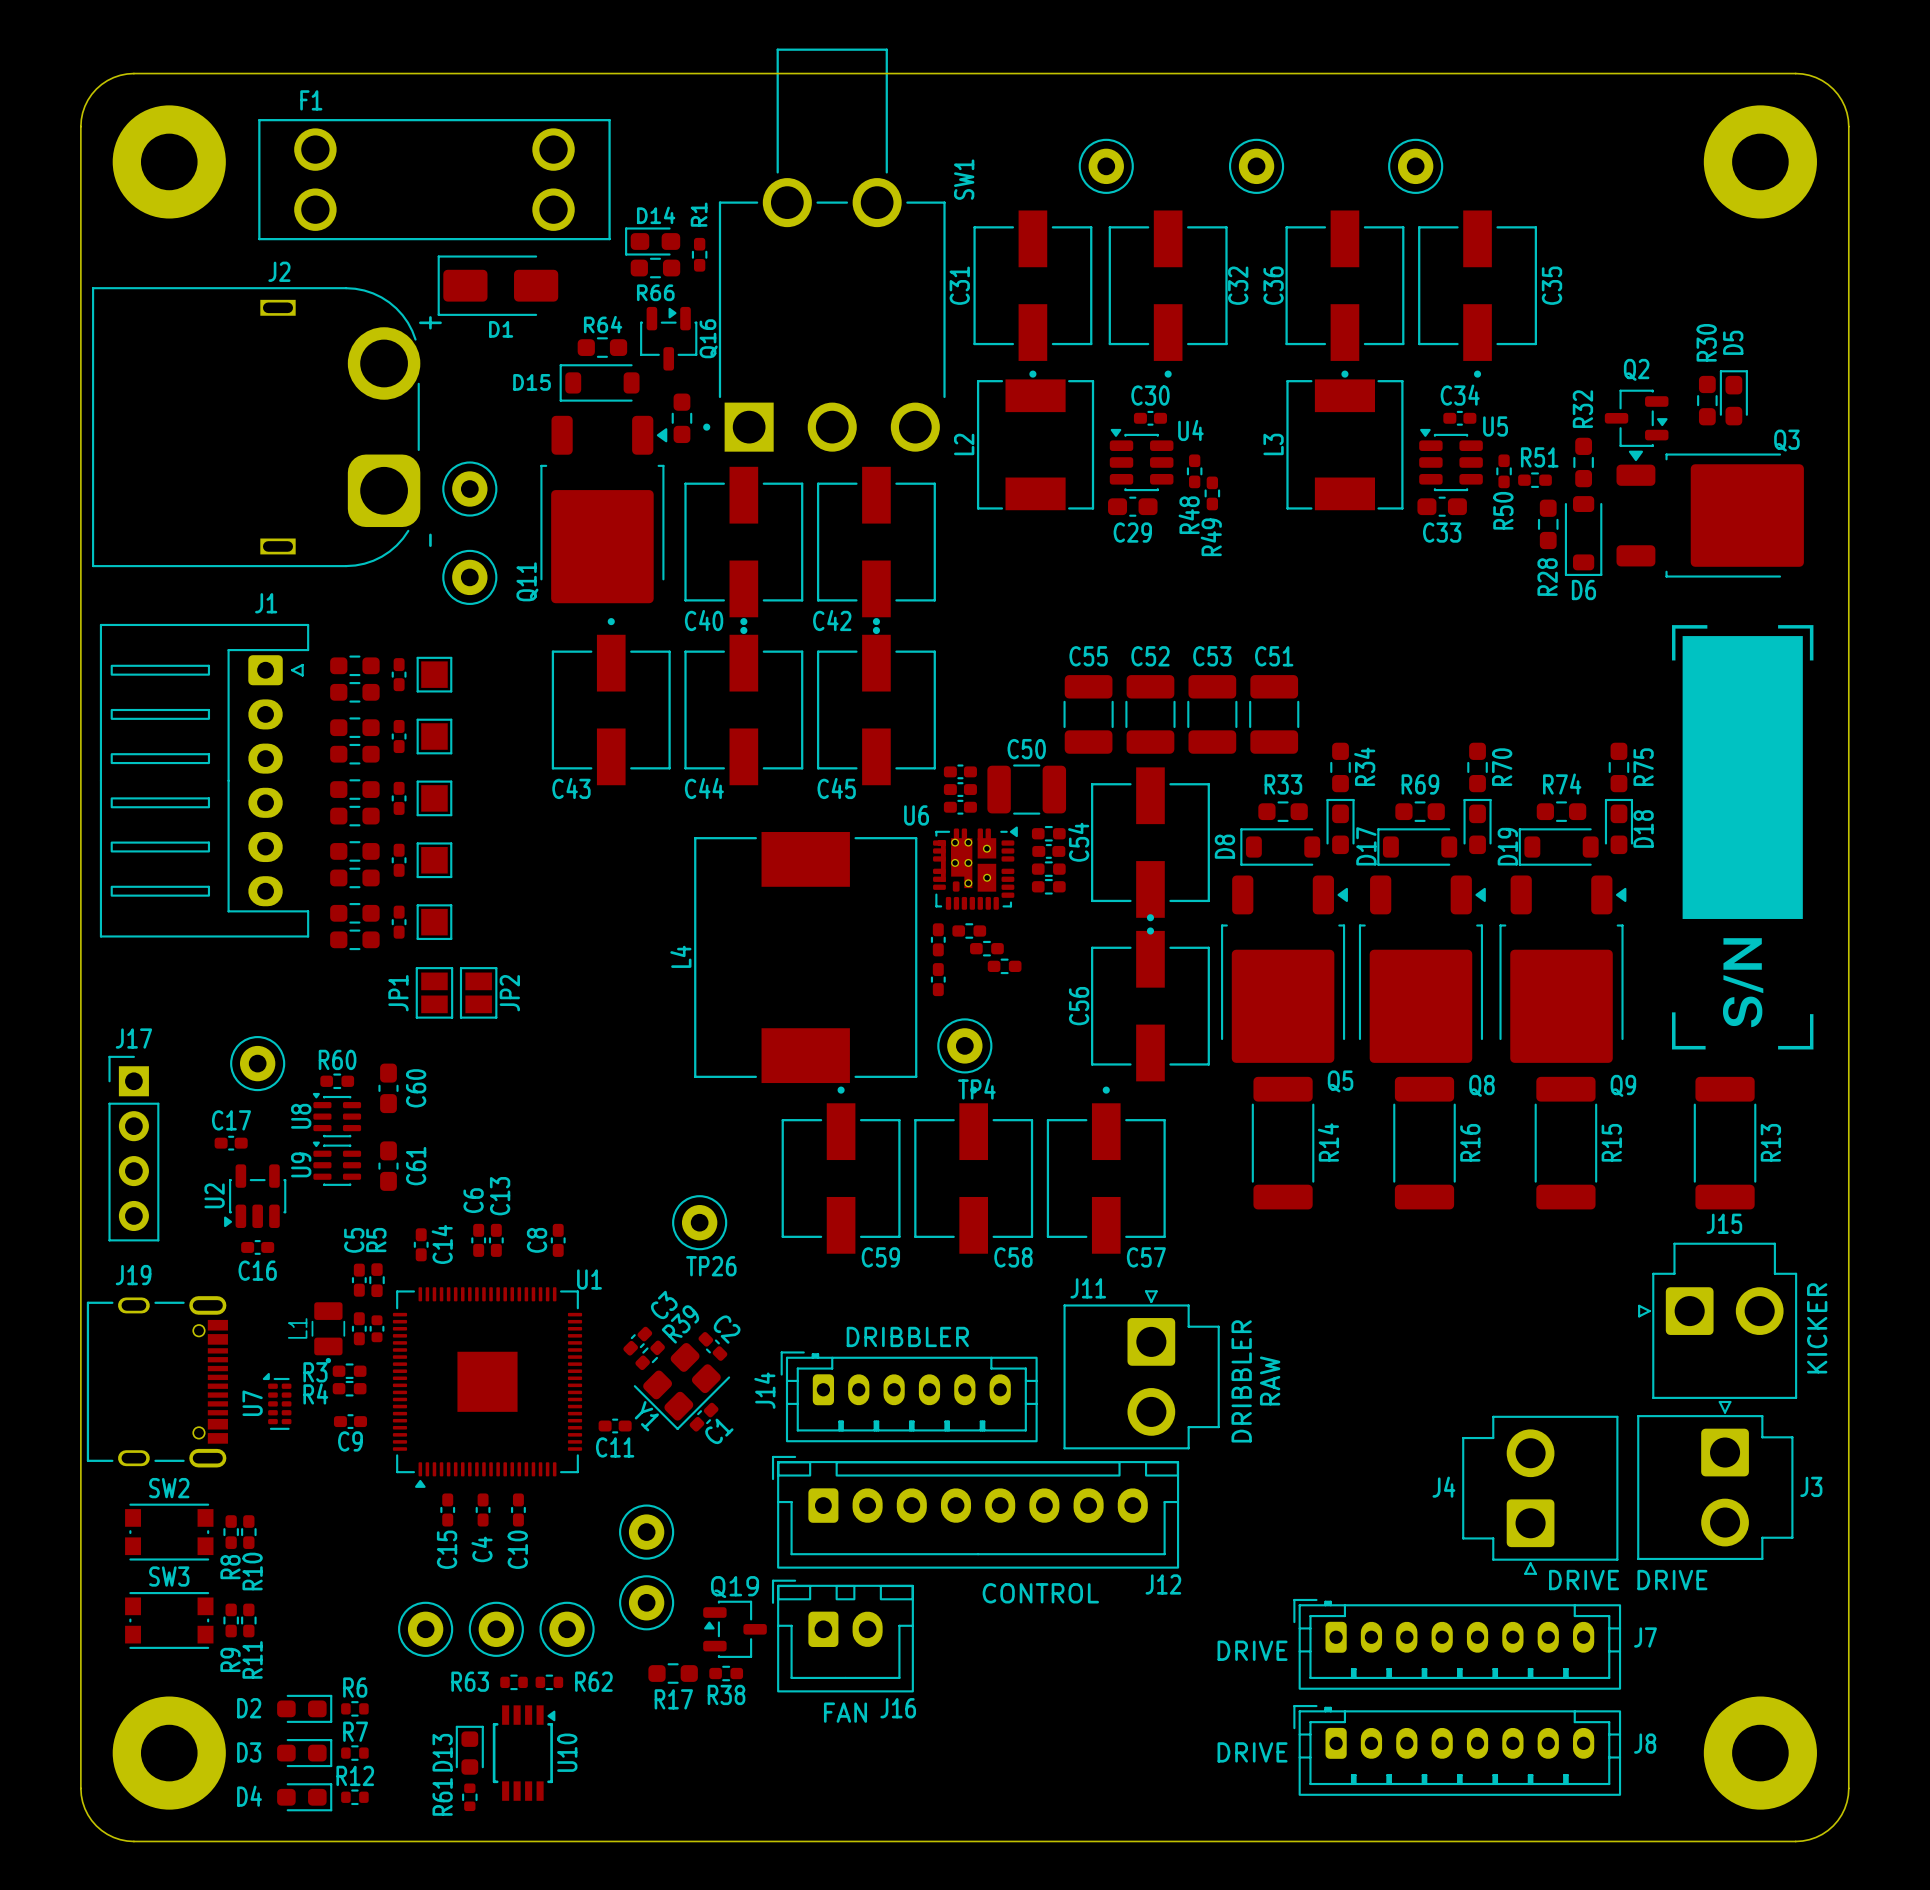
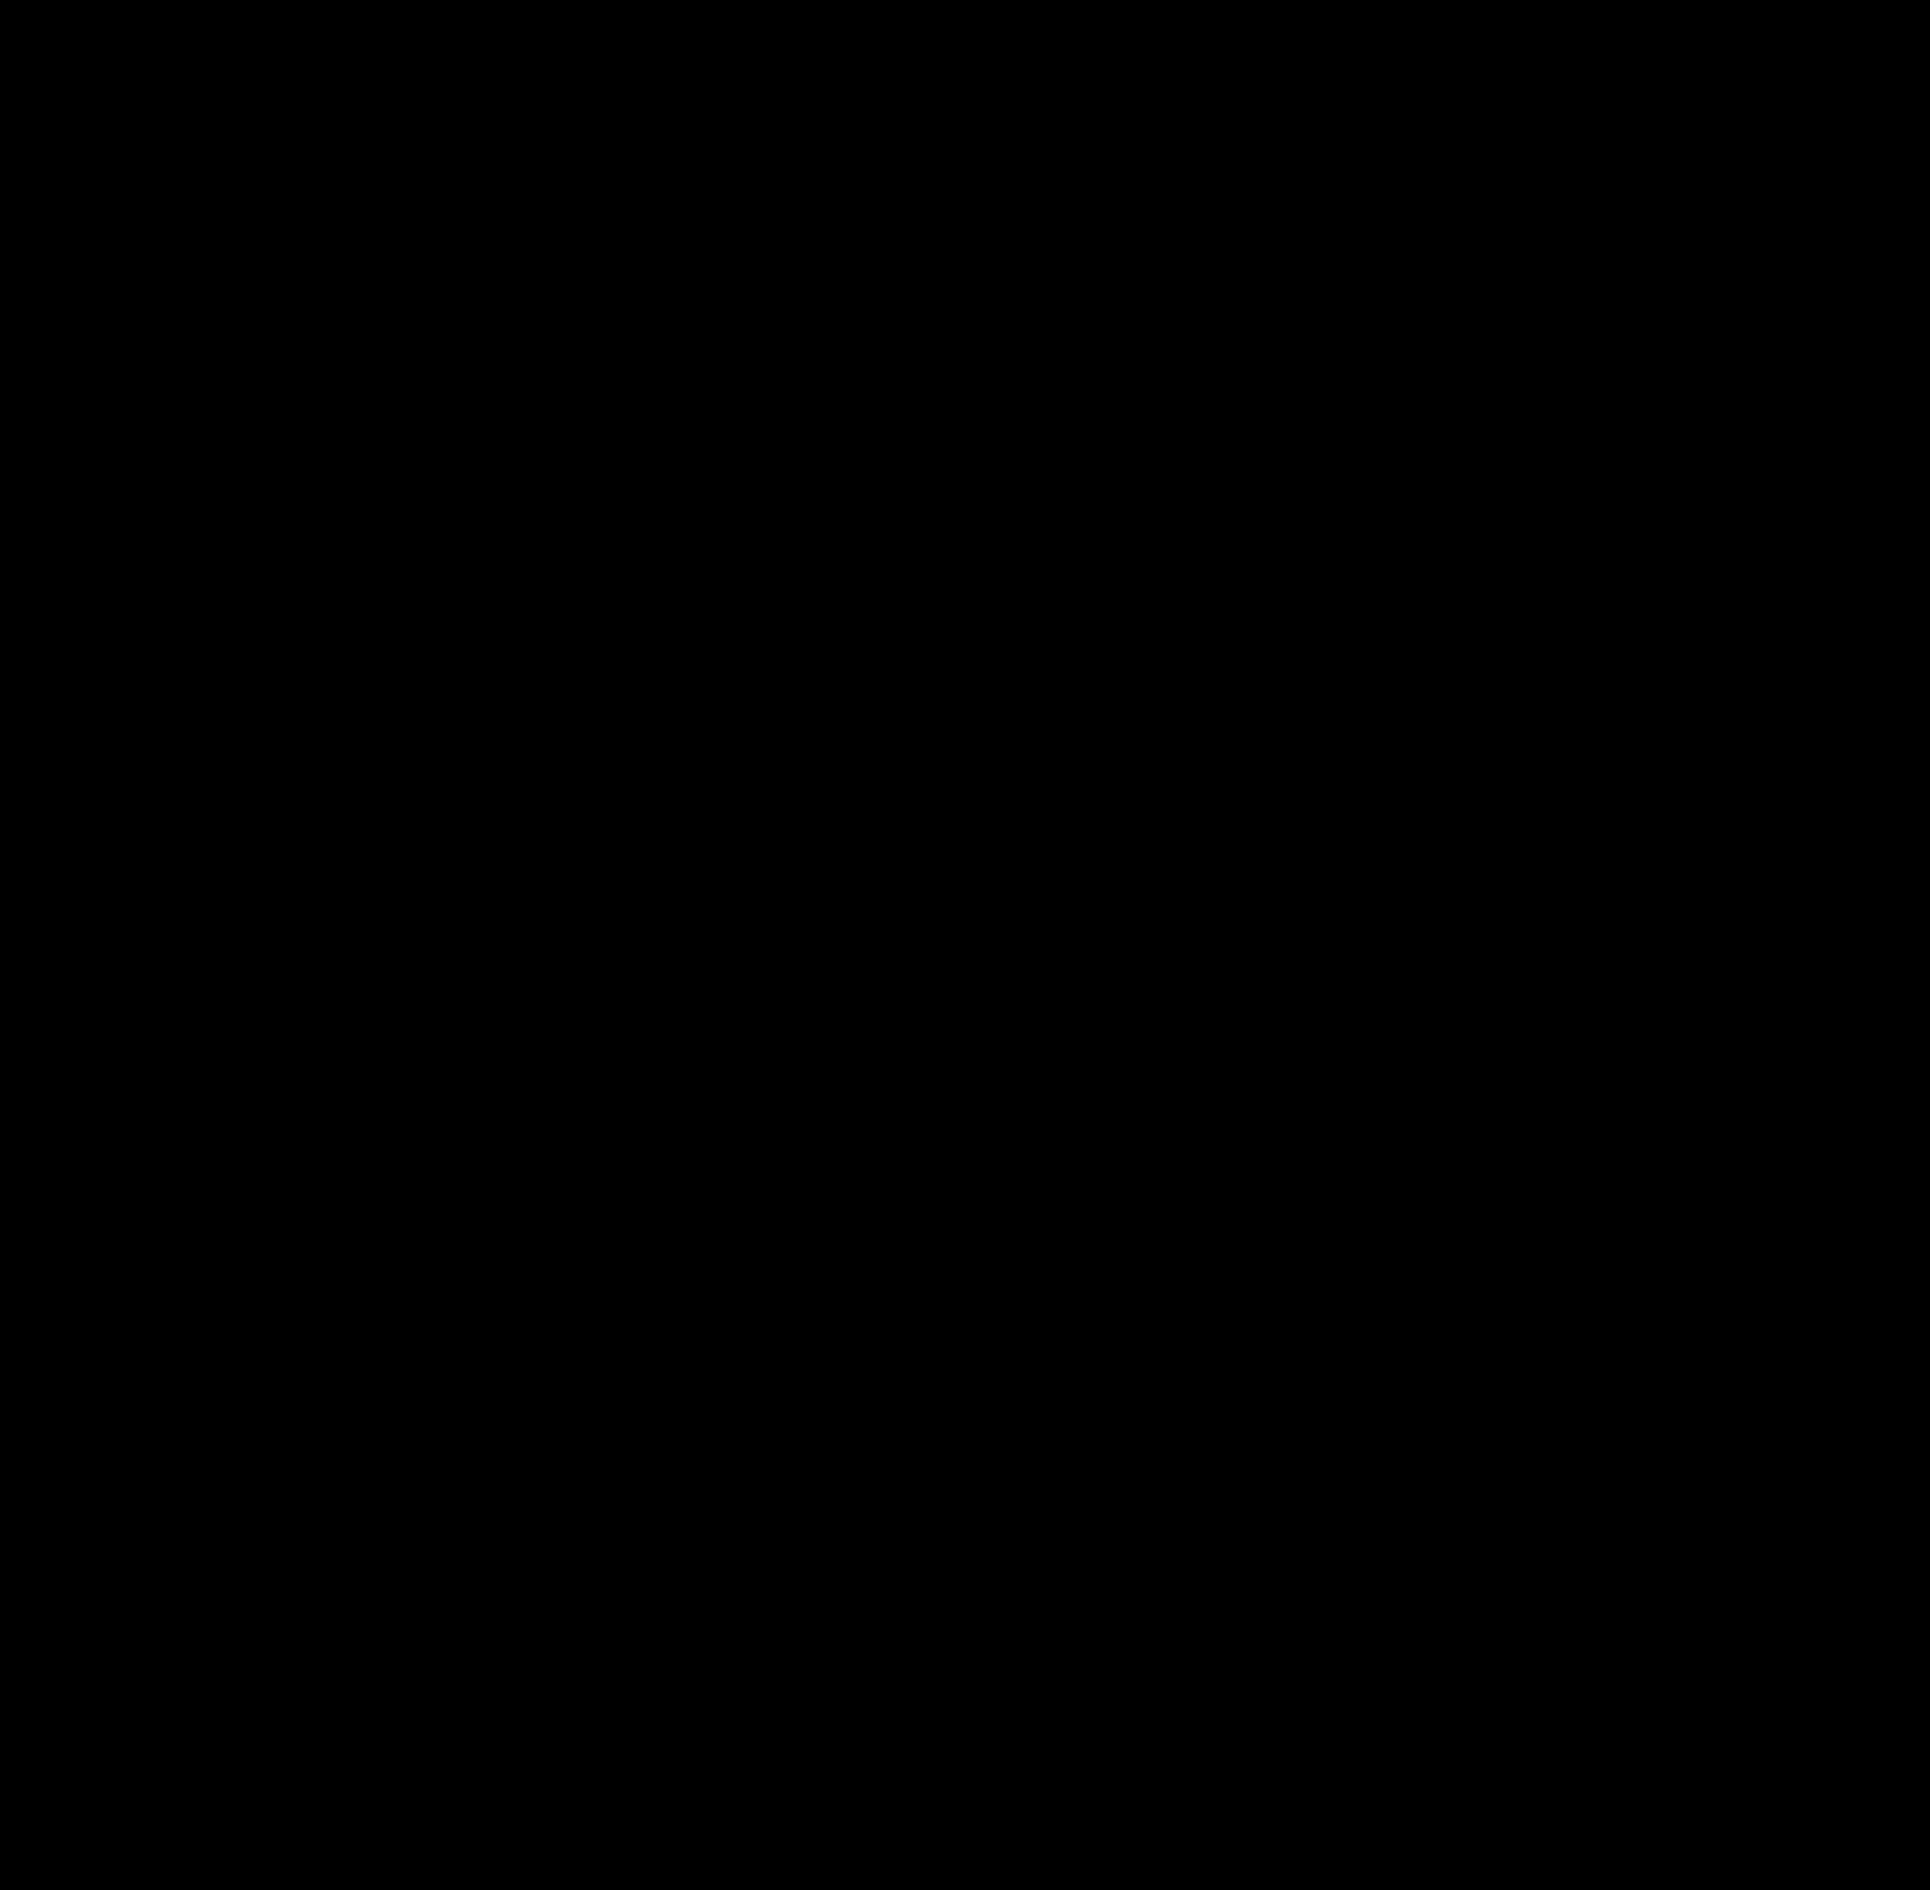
board edge: (133, 73) (1795, 73) (1816, 77) (1833, 89) (1844, 106) (1848, 126) (1848, 1788) (1844, 1808) (1833, 1825) (1816, 1837) (1795, 1841) (133, 1841) (113, 1837) (96, 1825) (84, 1808) (80, 1788) (80, 126) (84, 106) (96, 89) (113, 77) (133, 73) -> none
part: (169, 161) -> none
part: (1760, 161) -> none
part: (1106, 166) -> none
part: (1256, 166) -> none
part: (1415, 166) -> none
F1: (434, 179) -> none
D14: (652, 241) -> none
SW1: (824, 250) -> none
R1: (699, 254) -> none
R66: (655, 268) -> none
D1: (497, 285) -> none
C31: (1032, 294) -> none
C32: (1168, 294) -> none
C36: (1344, 294) -> none
C35: (1477, 294) -> none
Q16: (668, 338) -> none
R64: (602, 347) -> none
D15: (599, 382) -> none
D5: (1733, 397) -> none
R30: (1707, 400) -> none
part: (681, 418) -> none
C30: (1150, 418) -> none
C34: (1459, 418) -> none
Q2: (1636, 418) -> none
J2: (256, 427) -> none
L2: (1035, 444) -> none
L3: (1344, 444) -> none
U4: (1141, 460) -> none
U5: (1451, 460) -> none
R32: (1583, 462) -> none
R48: (1194, 471) -> none
R50: (1504, 471) -> none
R51: (1534, 480) -> none
part: (469, 489) -> none
R49: (1212, 493) -> none
C29: (1132, 506) -> none
C33: (1442, 506) -> none
Q11: (603, 509) -> none
Q3: (1710, 514) -> none
R28: (1548, 524) -> none
D6: (1583, 536) -> none
C40: (743, 550) -> none
C42: (876, 550) -> none
part: (469, 577) -> none
drawing: [1672, 625, 1814, 1050] -> none
part: (354, 665) -> none
part: (399, 674) -> none
part: (434, 674) -> none
part: (354, 692) -> none
C43: (611, 701) -> none
C44: (743, 701) -> none
C45: (876, 701) -> none
C55: (1088, 714) -> none
C52: (1150, 714) -> none
C53: (1212, 714) -> none
C51: (1274, 714) -> none
part: (354, 727) -> none
part: (399, 736) -> none
part: (434, 736) -> none
part: (354, 754) -> none
R34: (1340, 767) -> none
R70: (1477, 767) -> none
R75: (1618, 767) -> none
part: (960, 771) -> none
J1: (204, 780) -> none
part: (354, 789) -> none
part: (960, 789) -> none
C50: (1026, 789) -> none
part: (399, 798) -> none
part: (434, 798) -> none
part: (960, 807) -> none
R33: (1283, 811) -> none
R69: (1420, 811) -> none
R74: (1561, 811) -> none
part: (354, 816) -> none
part: (1340, 826) -> none
part: (1477, 826) -> none
D18: (1618, 826) -> none
part: (1048, 833) -> none
D8: (1280, 847) -> none
D17: (1417, 847) -> none
D19: (1558, 847) -> none
C54: (1150, 850) -> none
part: (354, 851) -> none
part: (1048, 851) -> none
part: (399, 860) -> none
part: (434, 860) -> none
U6: (975, 868) -> none
part: (1048, 869) -> none
part: (354, 877) -> none
part: (1048, 886) -> none
part: (354, 913) -> none
part: (399, 922) -> none
part: (434, 922) -> none
part: (969, 930) -> none
part: (354, 939) -> none
part: (938, 939) -> none
part: (986, 948) -> none
L4: (805, 957) -> none
part: (1004, 966) -> none
Q5: (1284, 969) -> none
Q8: (1422, 969) -> none
Q9: (1562, 969) -> none
part: (938, 979) -> none
JP1: (434, 992) -> none
JP2: (478, 992) -> none
C56: (1150, 997) -> none
TP4: (964, 1045) -> none
part: (257, 1063) -> none
R60: (337, 1081) -> none
C60: (388, 1088) -> none
U8: (336, 1115) -> none
C17: (231, 1143) -> none
R14: (1283, 1143) -> none
R16: (1424, 1143) -> none
R15: (1565, 1143) -> none
R13: (1725, 1143) -> none
J17: (133, 1148) -> none
U9: (336, 1163) -> none
C61: (388, 1166) -> none
C59: (841, 1170) -> none
C58: (973, 1170) -> none
C57: (1106, 1170) -> none
U2: (255, 1196) -> none
TP26: (699, 1222) -> none
C6: (478, 1240) -> none
C13: (496, 1240) -> none
C8: (558, 1240) -> none
C14: (421, 1244) -> none
C16: (257, 1247) -> none
C5: (359, 1280) -> none
R5: (377, 1280) -> none
J15: (1717, 1320) -> none
part: (359, 1328) -> none
part: (377, 1328) -> none
text: KICKER (1817, 1328) -> none
L1: (328, 1332) -> none
text: DRIBBLER (907, 1336) -> none
C3: (637, 1341) -> none
C2: (712, 1346) -> none
R39: (650, 1355) -> none
J11: (1141, 1369) -> none
R3: (349, 1371) -> none
text: RAW (1270, 1380) -> none
J19: (157, 1381) -> none
text: DRIBBLER (1241, 1381) -> none
Y1: (681, 1386) -> none
U1: (487, 1387) -> none
R4: (349, 1388) -> none
J14: (909, 1396) -> none
U7: (277, 1401) -> none
C1: (704, 1417) -> none
C9: (350, 1421) -> none
C11: (615, 1426) -> none
J3: (1715, 1480) -> none
J4: (1540, 1495) -> none
C15: (447, 1509) -> none
C4: (483, 1509) -> none
C10: (518, 1509) -> none
J12: (975, 1512) -> none
SW2: (169, 1532) -> none
R8: (231, 1532) -> none
R10: (248, 1532) -> none
part: (646, 1532) -> none
text: DRIVE (1584, 1580) -> none
text: DRIVE (1672, 1580) -> none
text: CONTROL (1040, 1593) -> none
part: (646, 1602) -> none
SW3: (169, 1620) -> none
R9: (231, 1620) -> none
R11: (248, 1620) -> none
part: (425, 1629) -> none
part: (496, 1629) -> none
part: (567, 1629) -> none
Q19: (735, 1629) -> none
J16: (842, 1636) -> none
J7: (1457, 1644) -> none
text: DRIVE (1252, 1650) -> none
R17: (673, 1673) -> none
R38: (726, 1673) -> none
R63: (514, 1682) -> none
R62: (549, 1682) -> none
D2: (304, 1708) -> none
R6: (354, 1708) -> none
text: FAN (845, 1712) -> none
D13: (469, 1750) -> none
J8: (1457, 1750) -> none
text: DRIVE (1252, 1752) -> none
part: (169, 1753) -> none
D3: (304, 1753) -> none
R7: (354, 1753) -> none
U10: (524, 1753) -> none
part: (1760, 1753) -> none
D4: (304, 1797) -> none
R12: (354, 1797) -> none
R61: (469, 1797) -> none

